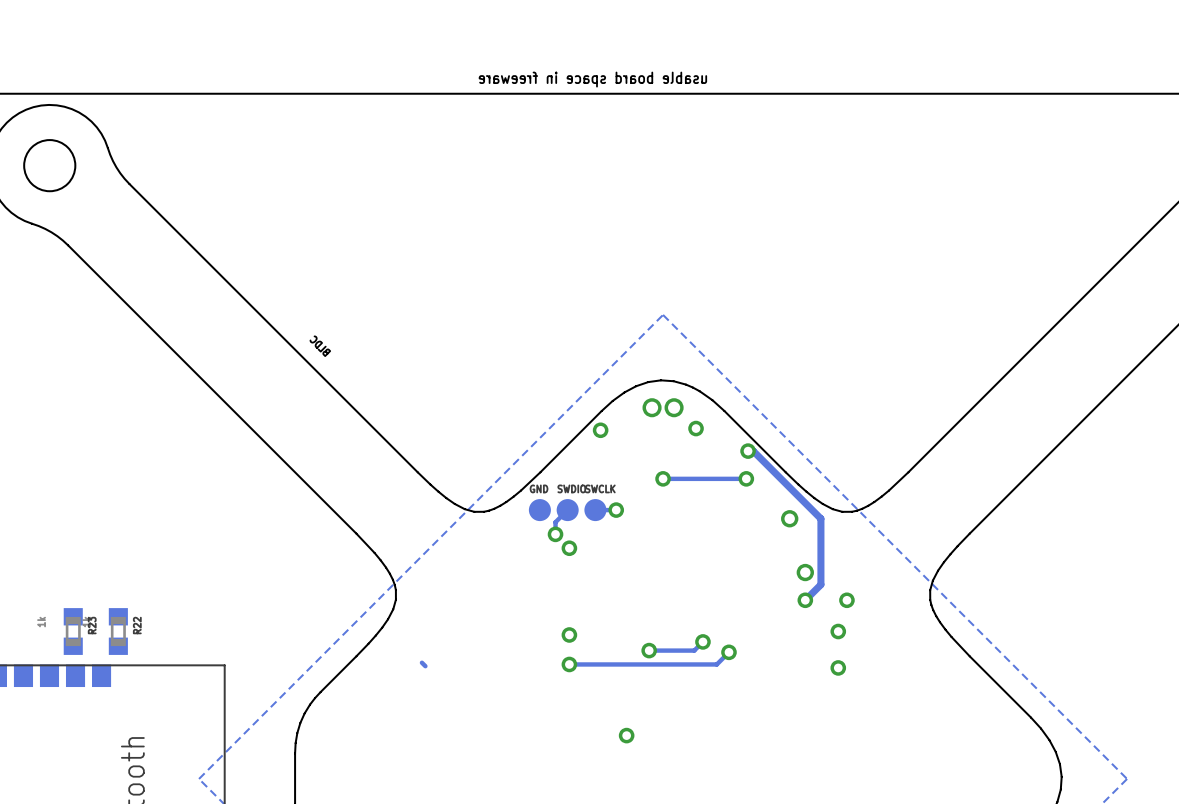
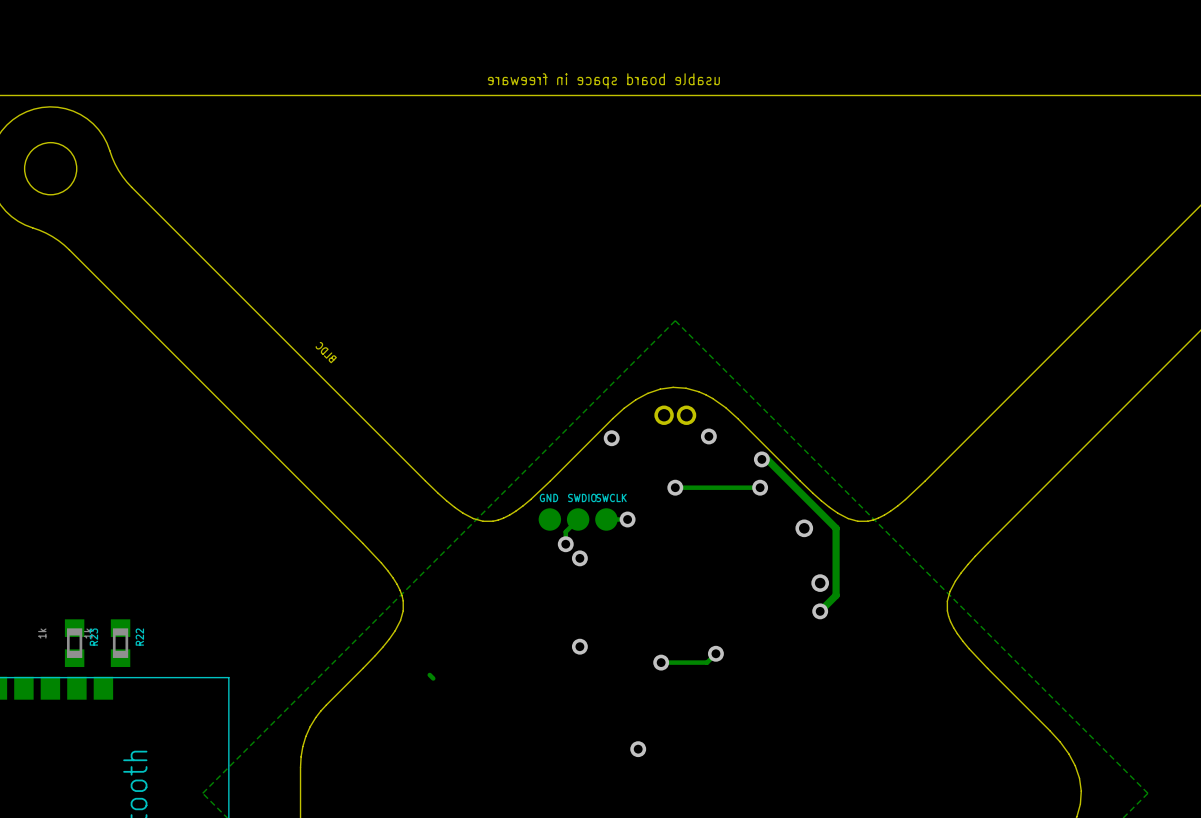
via: (846, 600) -> none
via: (838, 631) -> none
track: (728, 652) (716, 664) (569, 664) -> none
via: (728, 652) -> none
via: (569, 664) -> none
via: (838, 667) -> none

